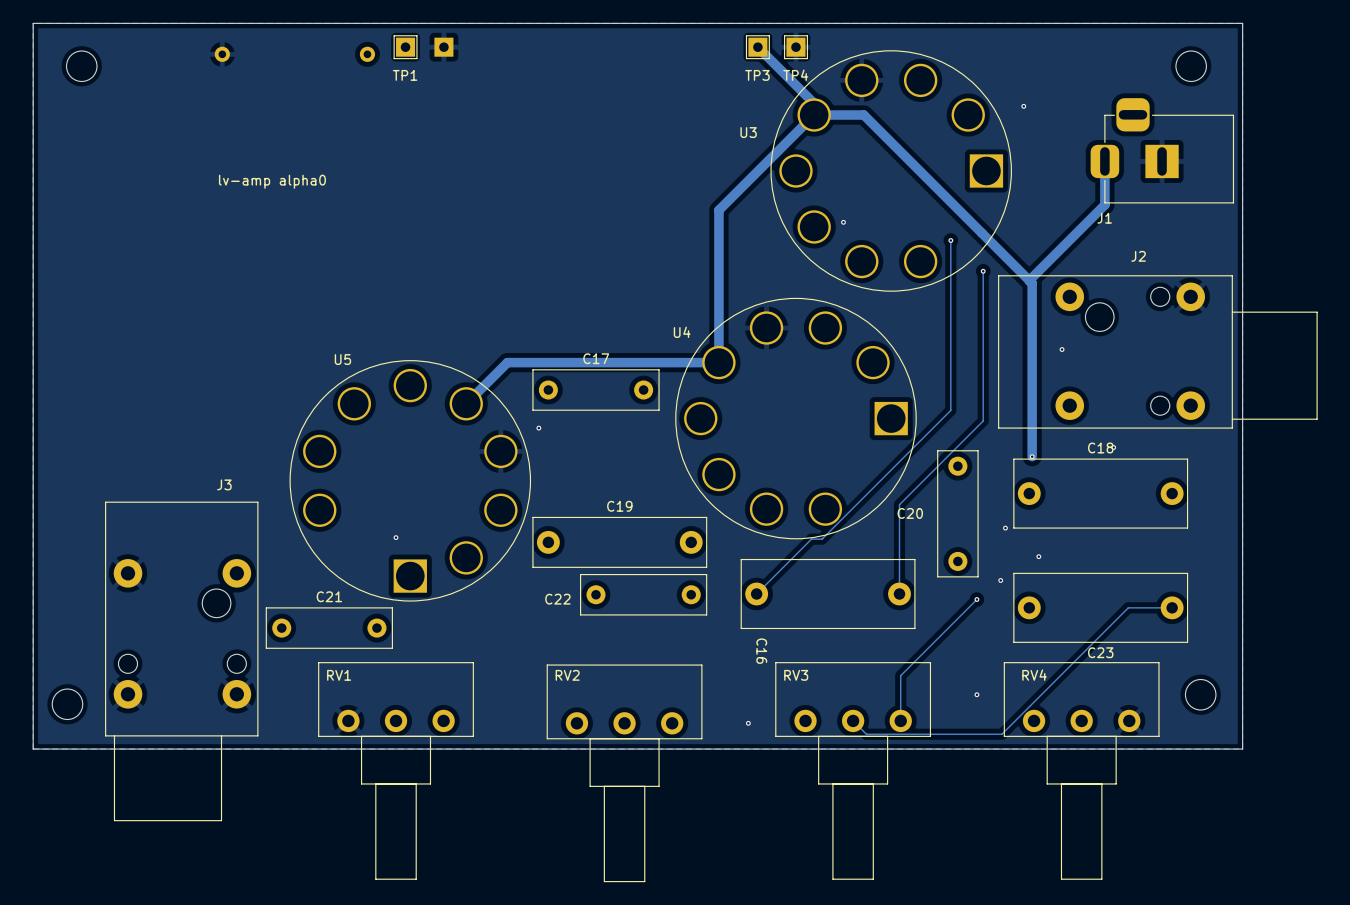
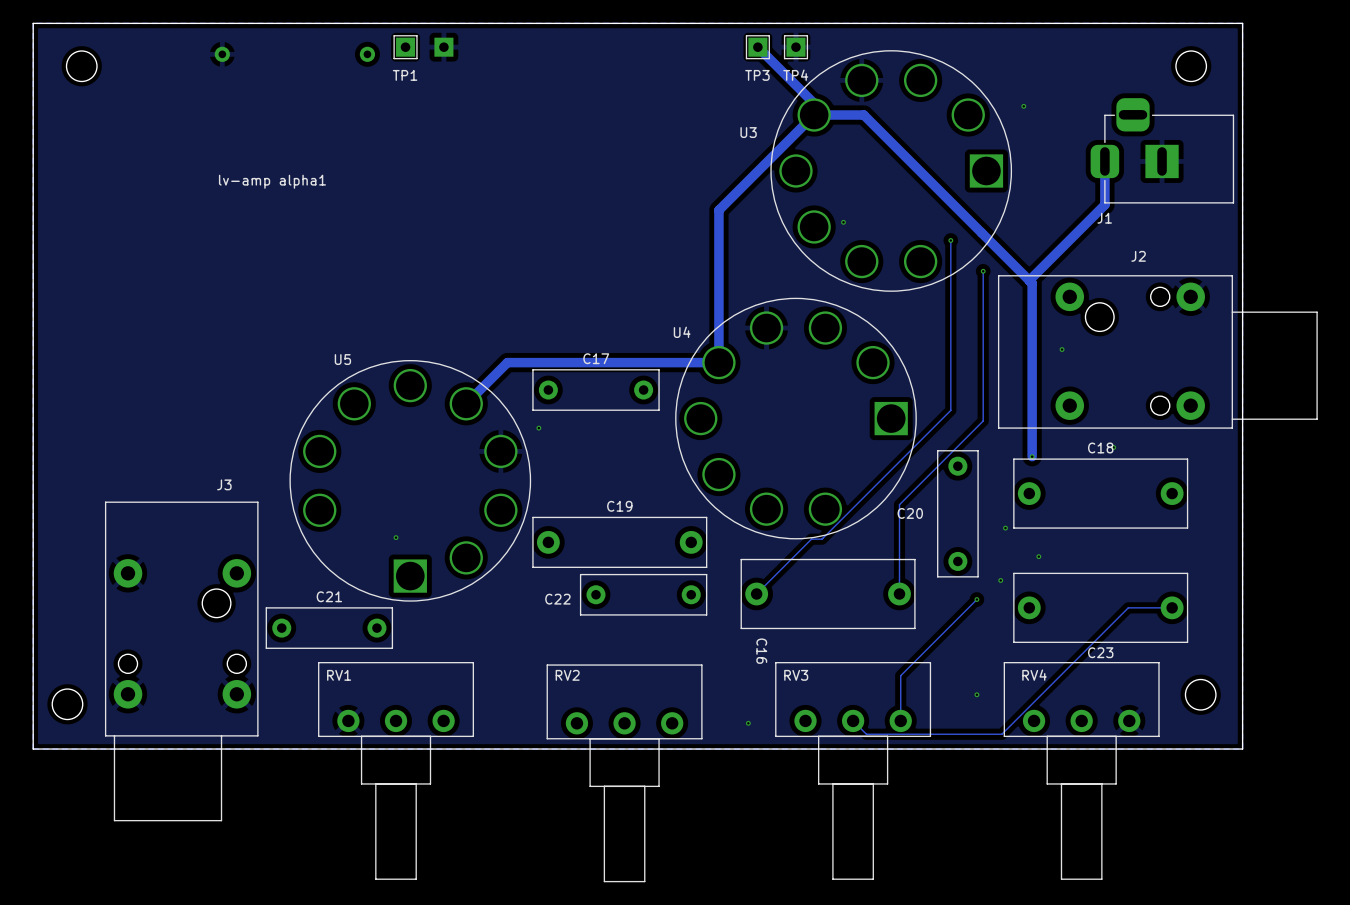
text: lv-amp alpha0 (272, 181) -> lv-amp alpha1 (272, 181)

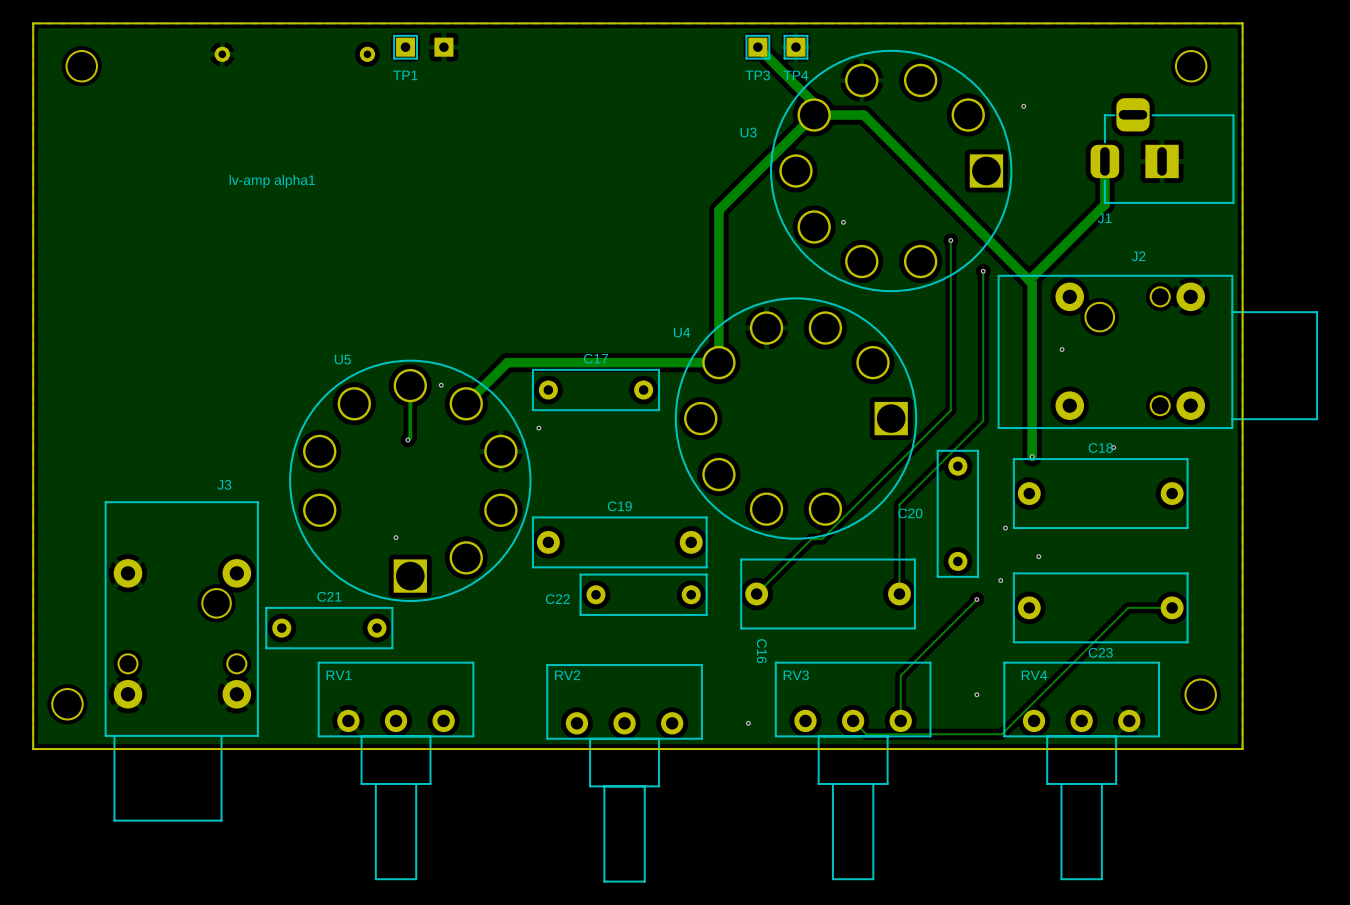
track: none -> (410, 385) (410, 437) (407, 440)
via: none -> (441, 385)
via: none -> (407, 440)

